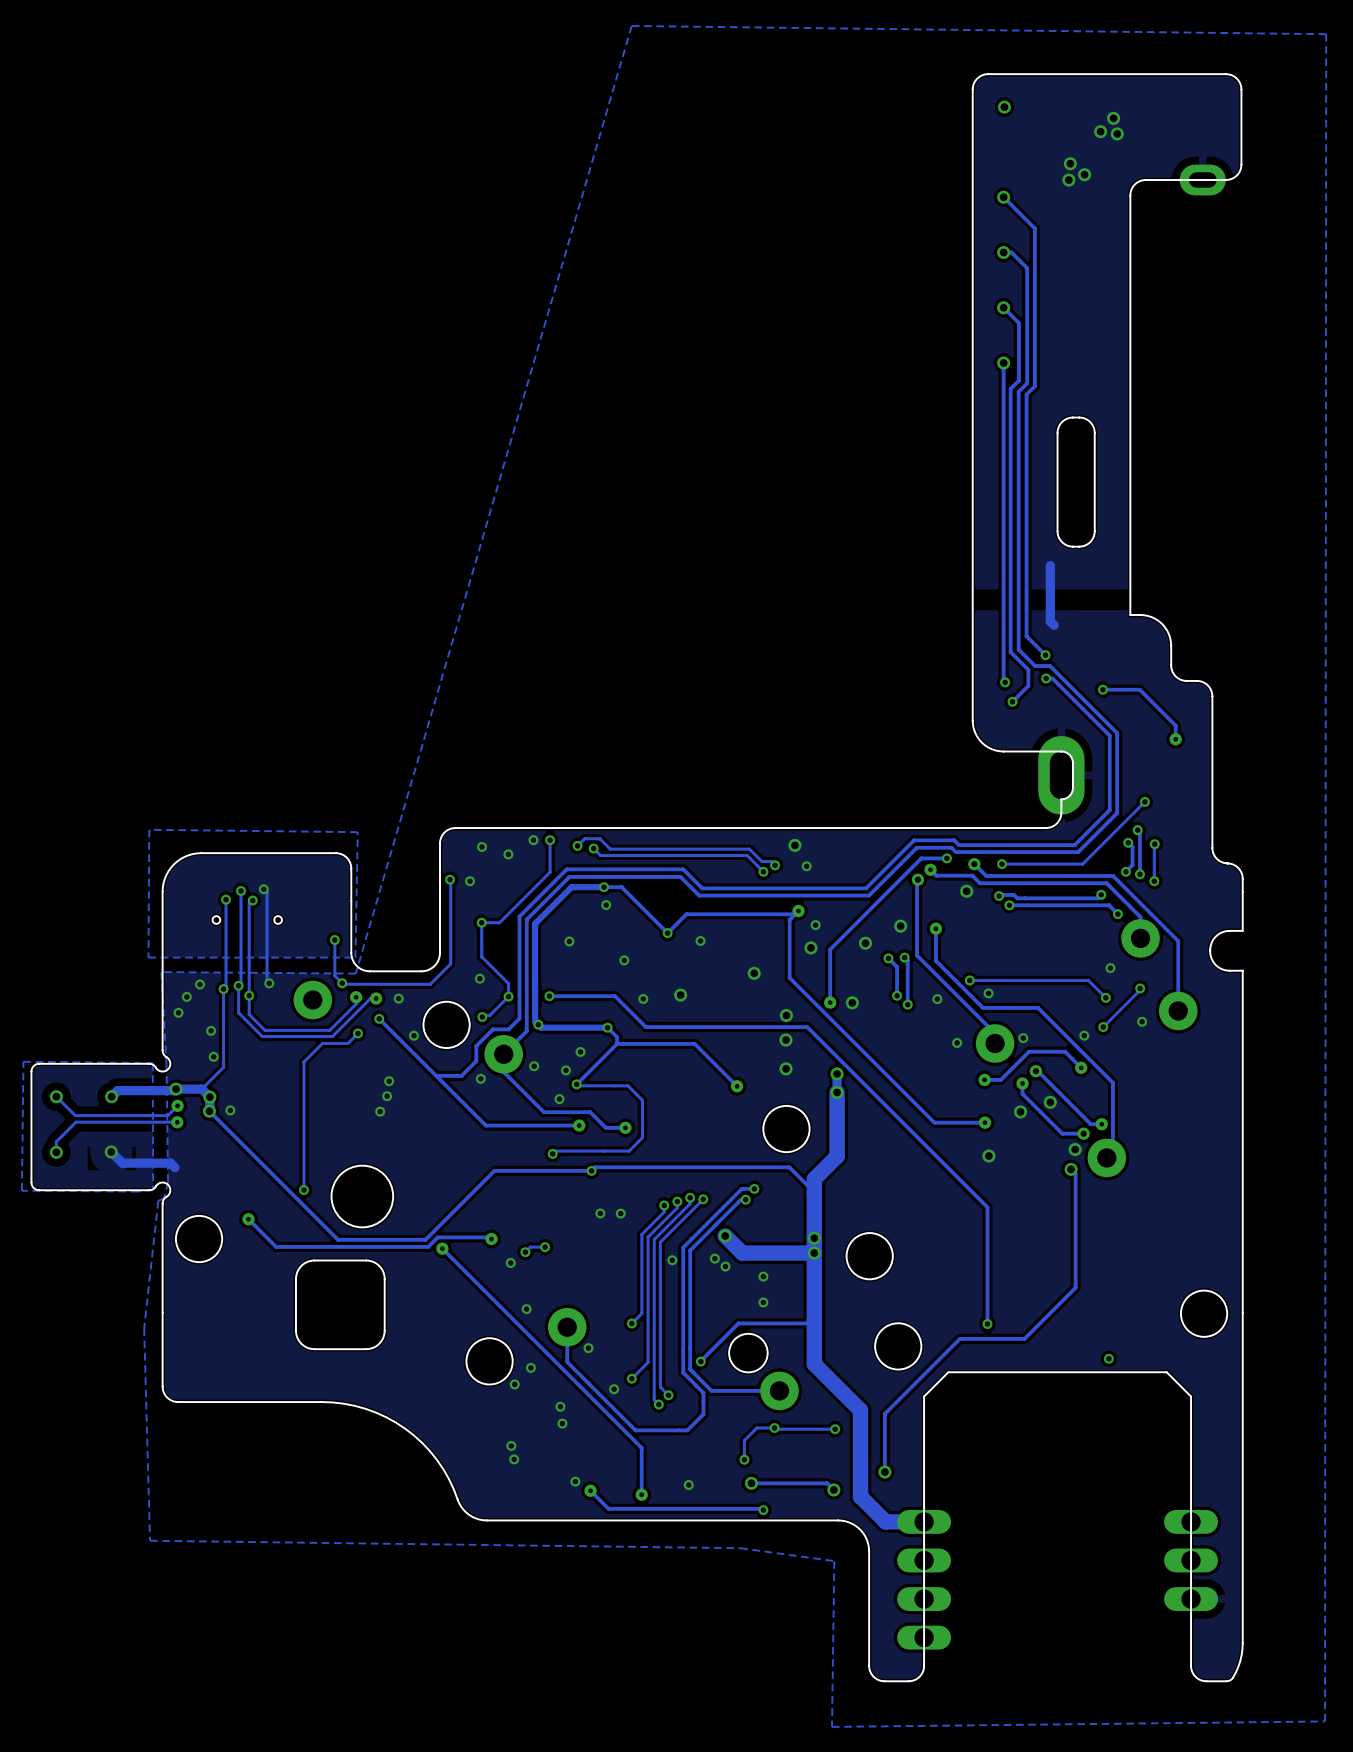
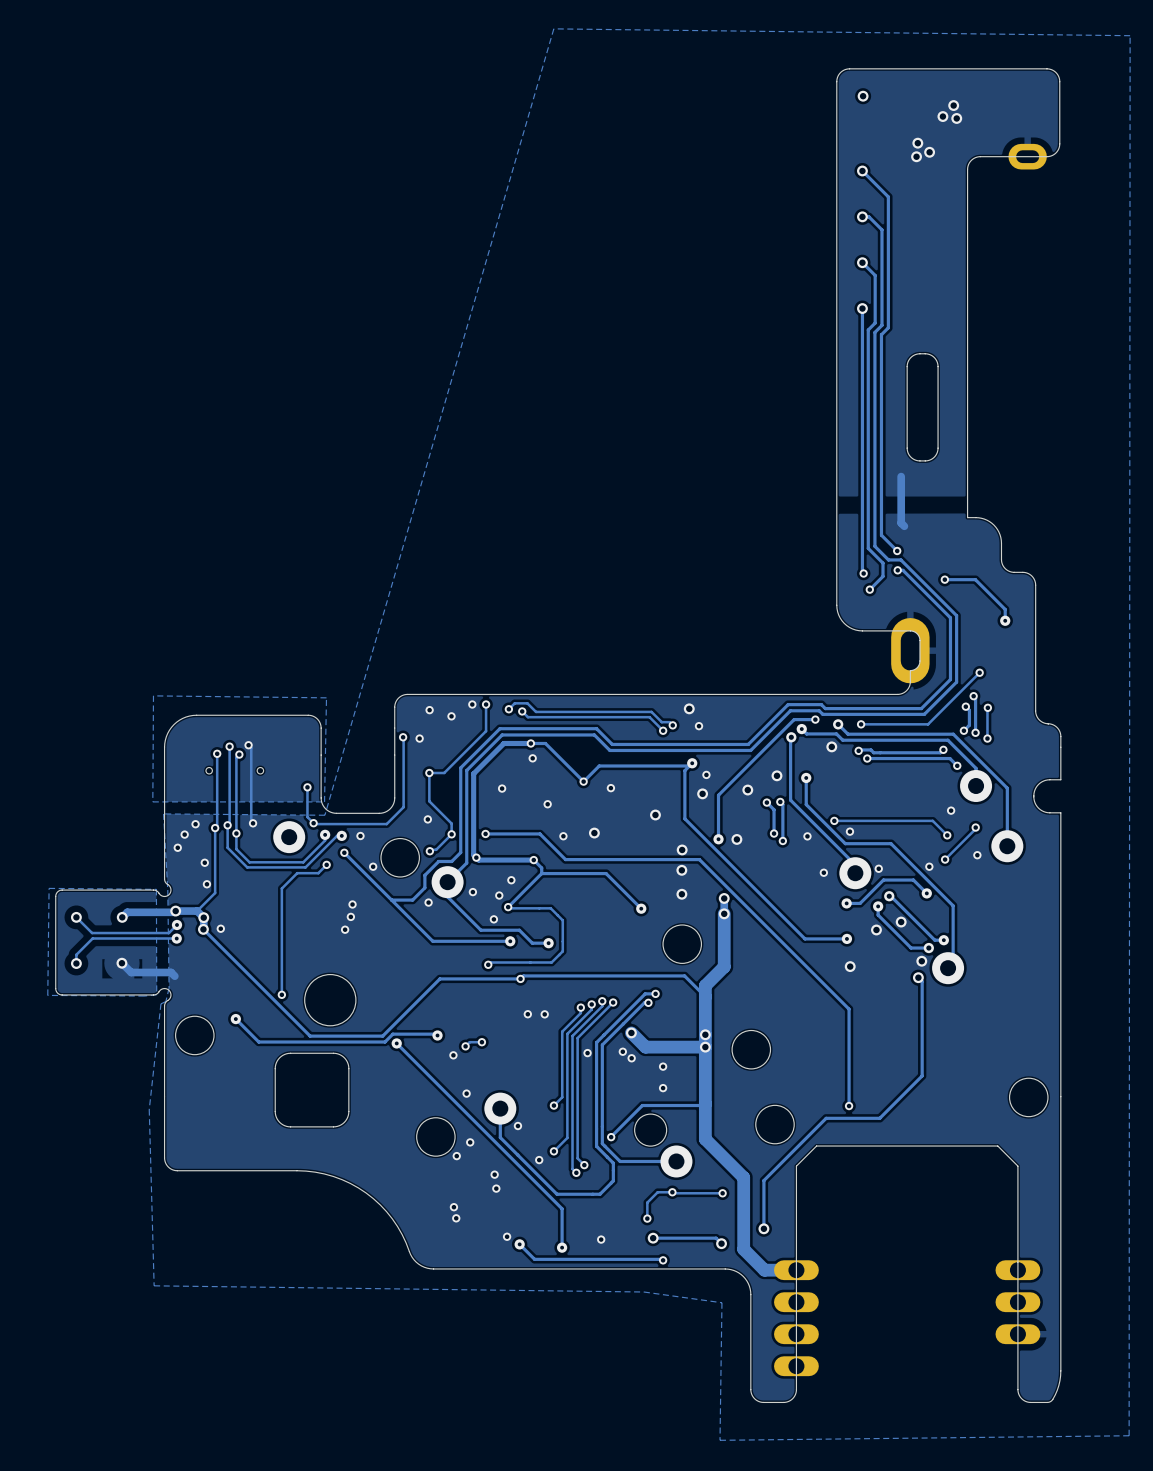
via: (1108, 1358) -> none

